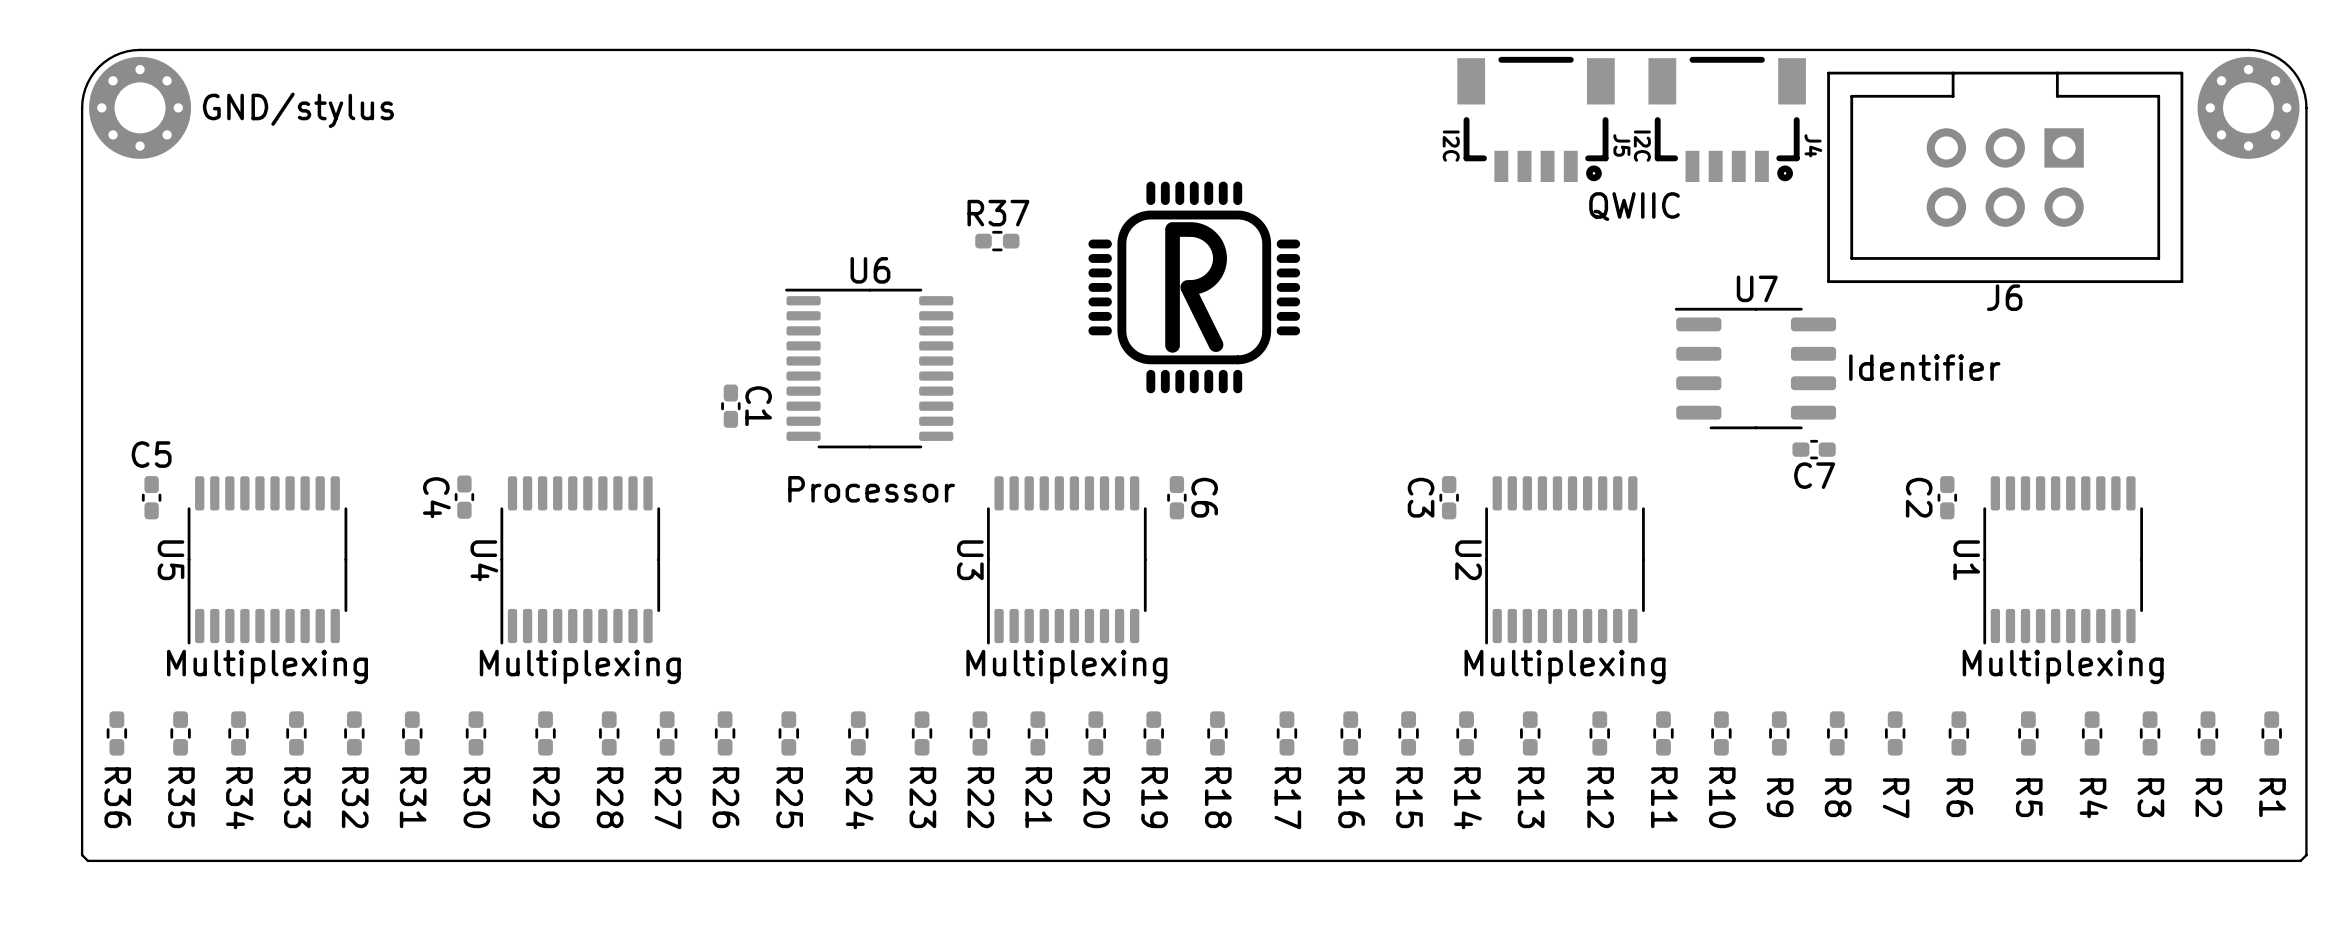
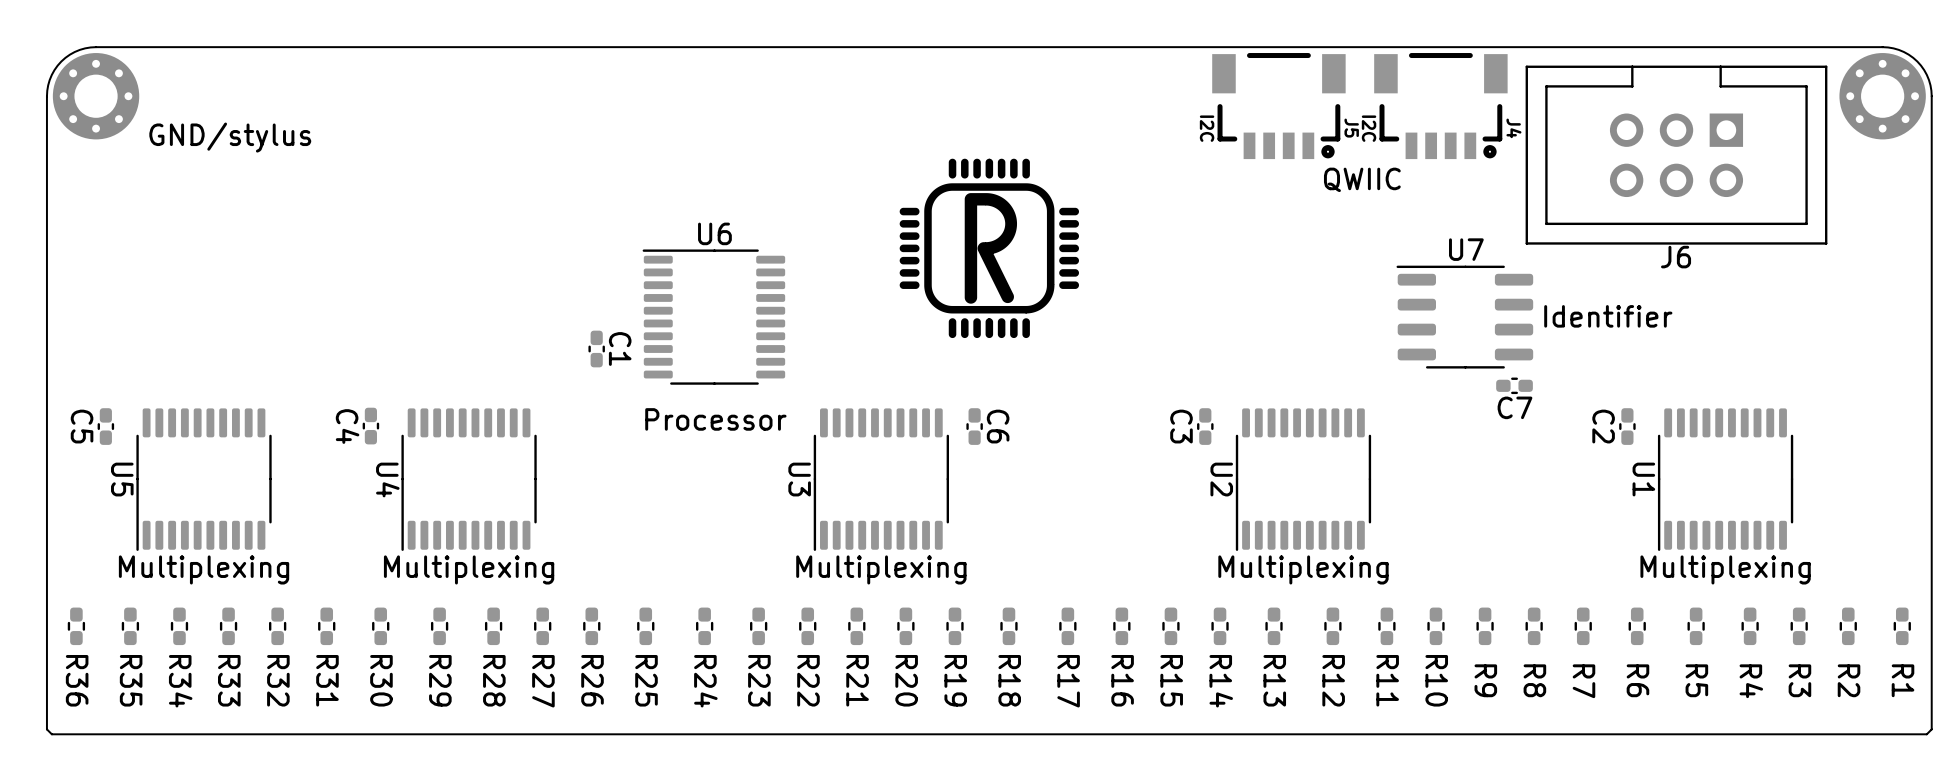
text position: GND/stylus (298, 110) -> GND/stylus (230, 137)
R37: (997, 241) -> none
C5 name rotation: 0° (151, 454) -> 90° clockwise (82, 426)

